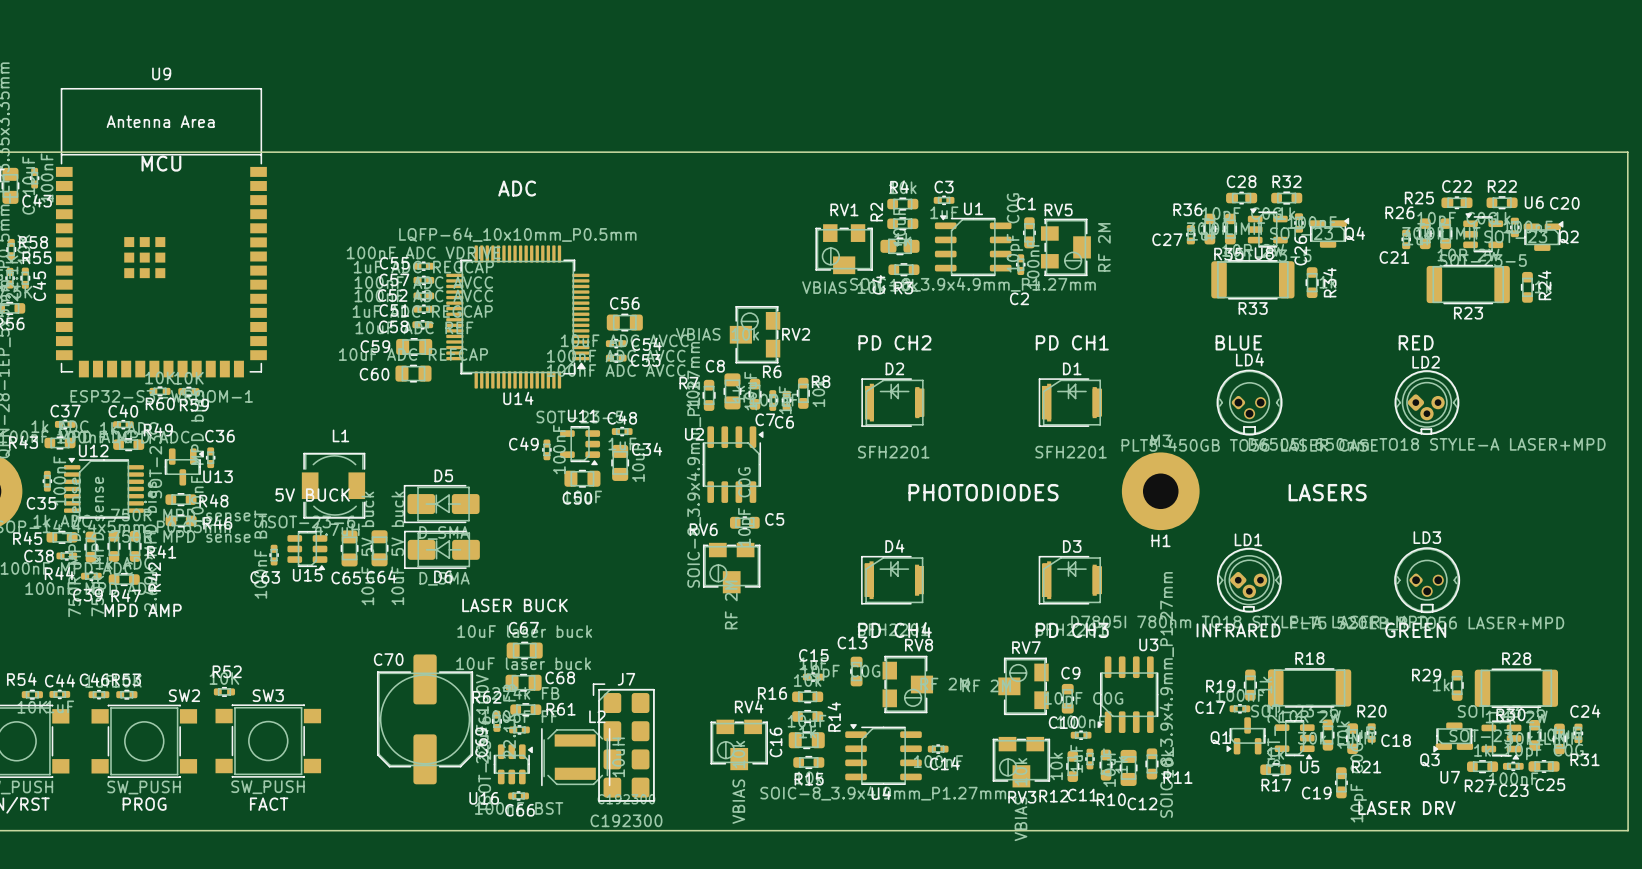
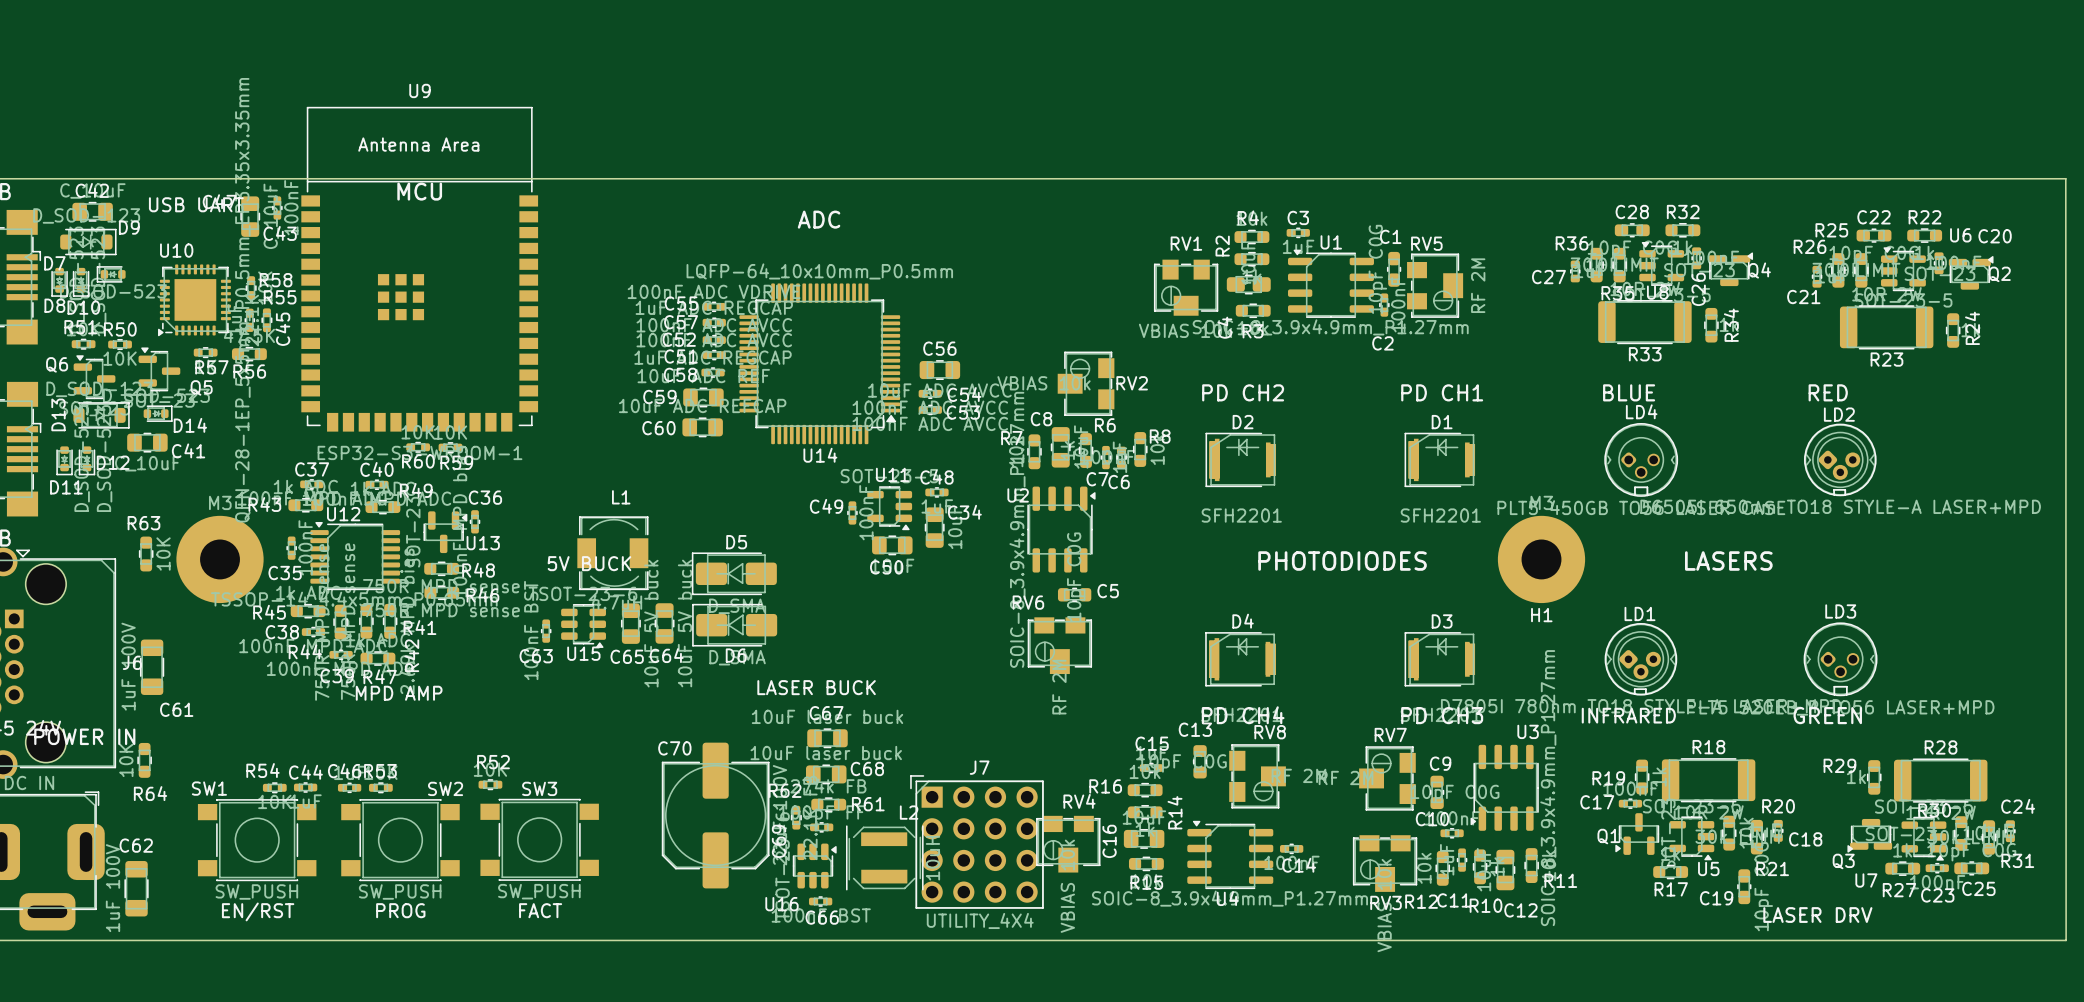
J7 footprint: [592, 683, 655, 802] -> [910, 775, 1044, 909]
J7 value: C192300 (626, 820) -> UTILITY_4X4 (980, 920)

